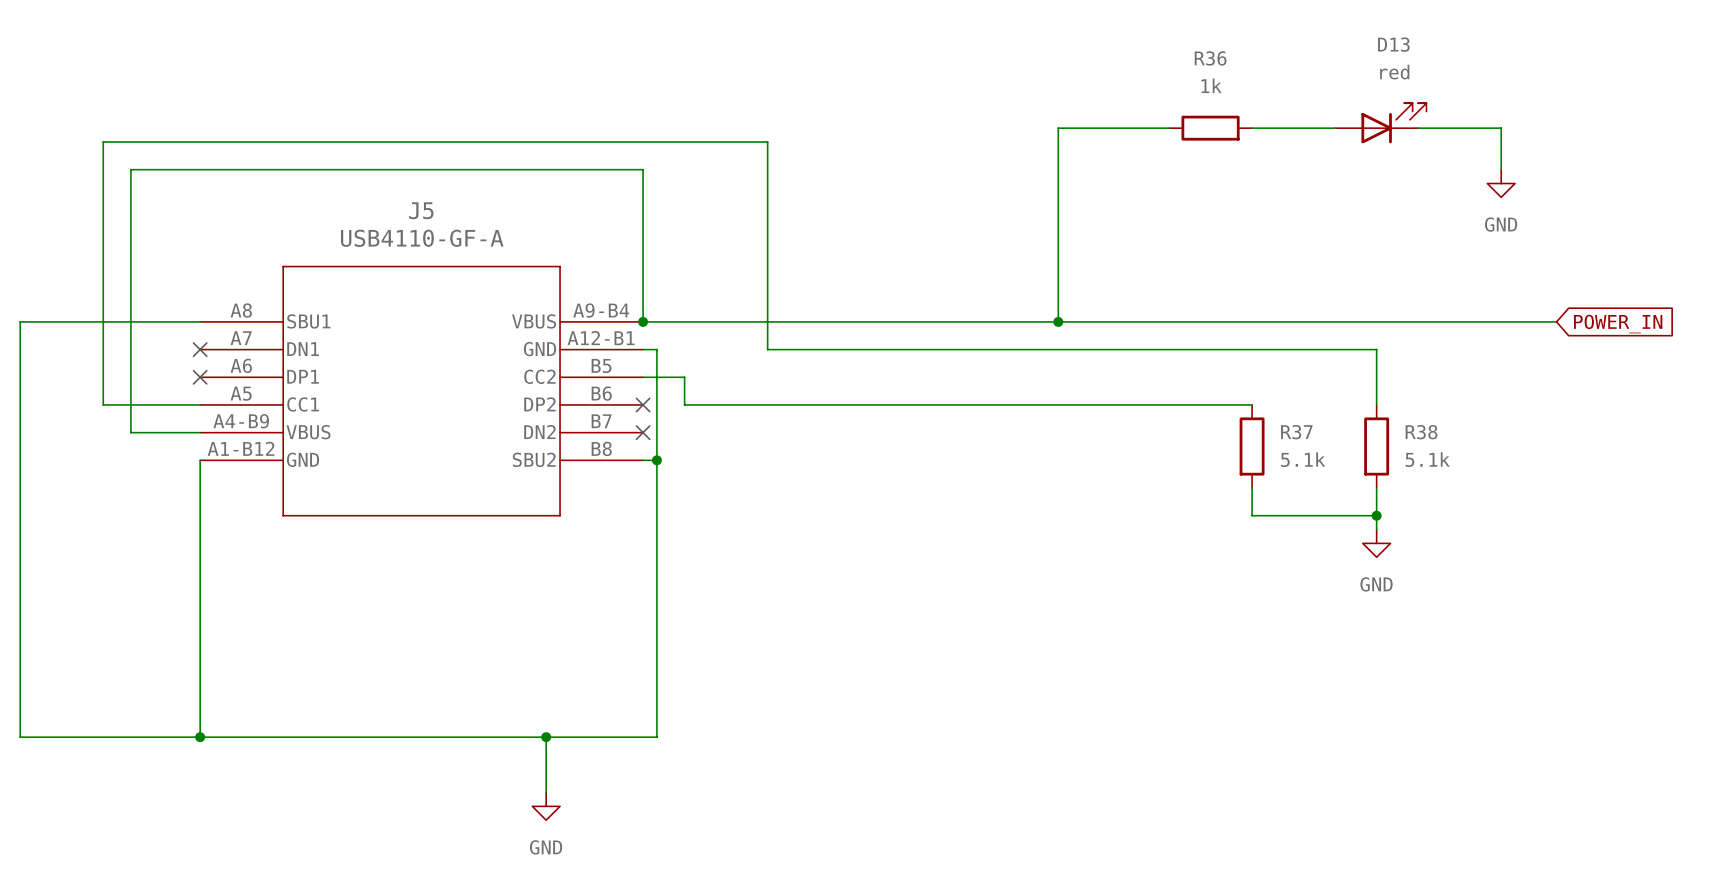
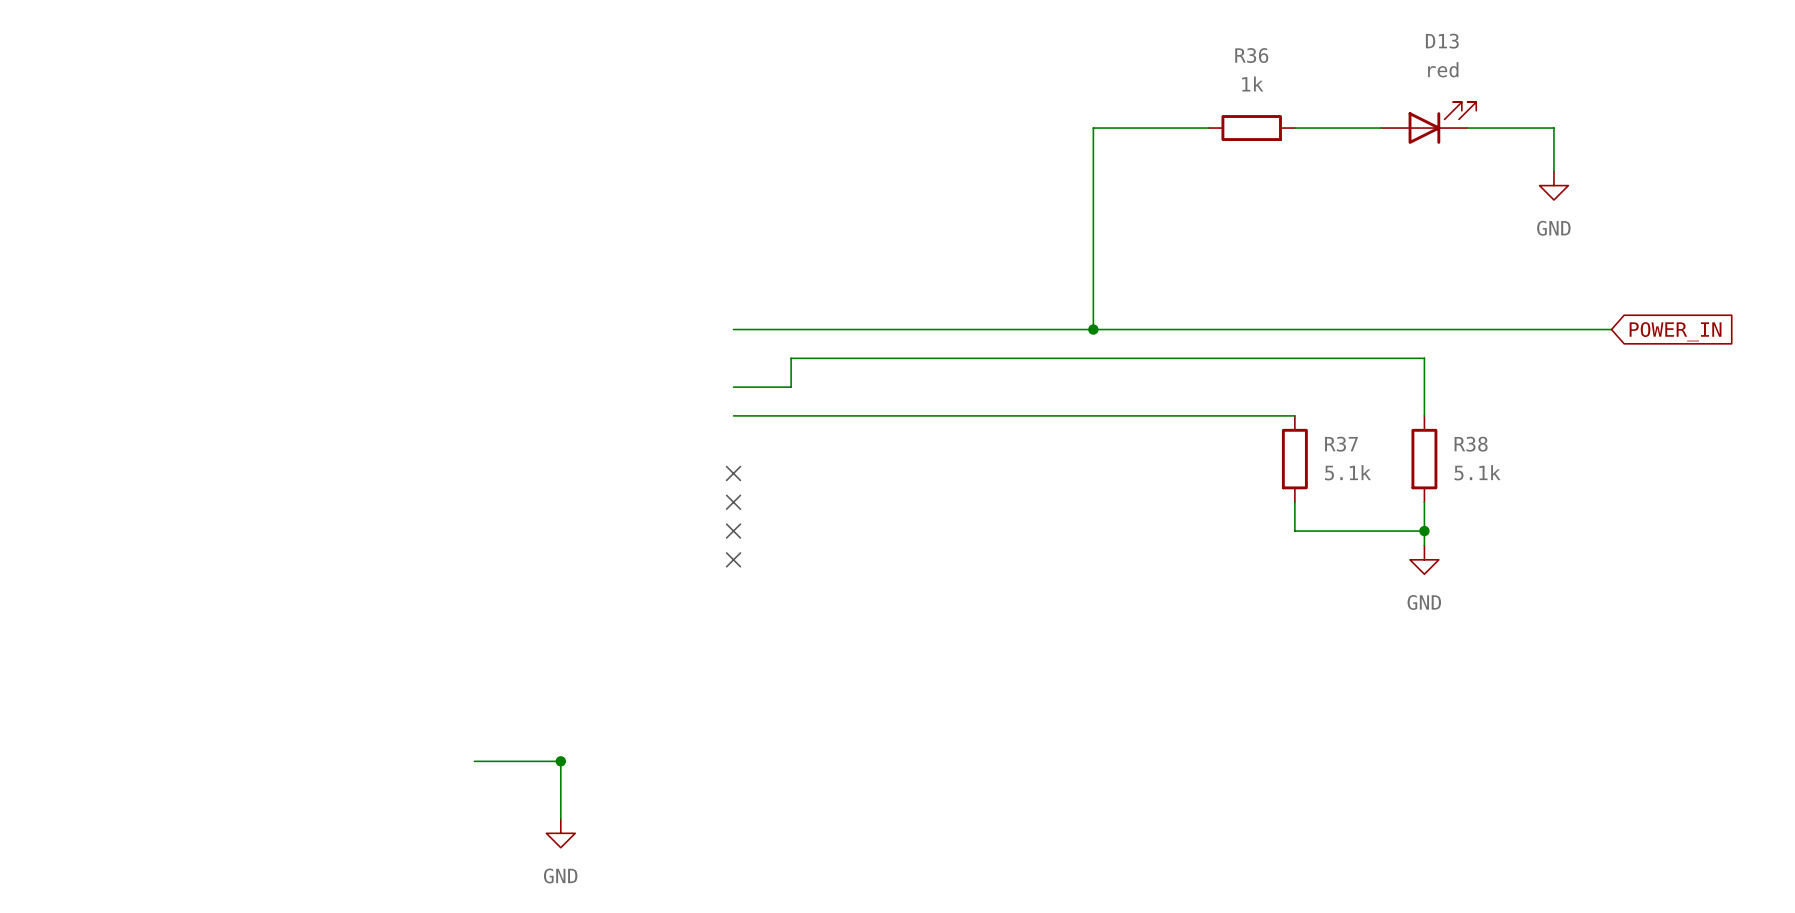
wire: (200, 321) (20, 321) (20, 737) (463, 737) -> none
junction: (643, 321) -> none
wire: (712, 321) (643, 321) (643, 169) (130, 169) (130, 432) (200, 432) -> none
no-connect mark: (200, 349) -> none
wire: (643, 349) (656, 349) (656, 737) (546, 737) -> none
wire: (767, 349) (767, 142) (103, 142) (103, 404) (200, 404) -> (791, 358) (791, 387) (733, 387)
no-connect mark: (200, 377) -> none
wire: (643, 377) (684, 377) (684, 404) (712, 404) -> none
J5: USB4110-GF-A (421, 391) -> none
no-connect mark: (643, 404) -> none
no-connect mark: (643, 432) -> none
wire: (200, 460) (200, 737) -> none
wire: (643, 460) (656, 460) -> none
junction: (656, 460) -> none
no-connect mark: none -> (733, 473)
no-connect mark: none -> (733, 502)
no-connect mark: none -> (733, 531)
no-connect mark: none -> (733, 559)
junction: (200, 737) -> none

